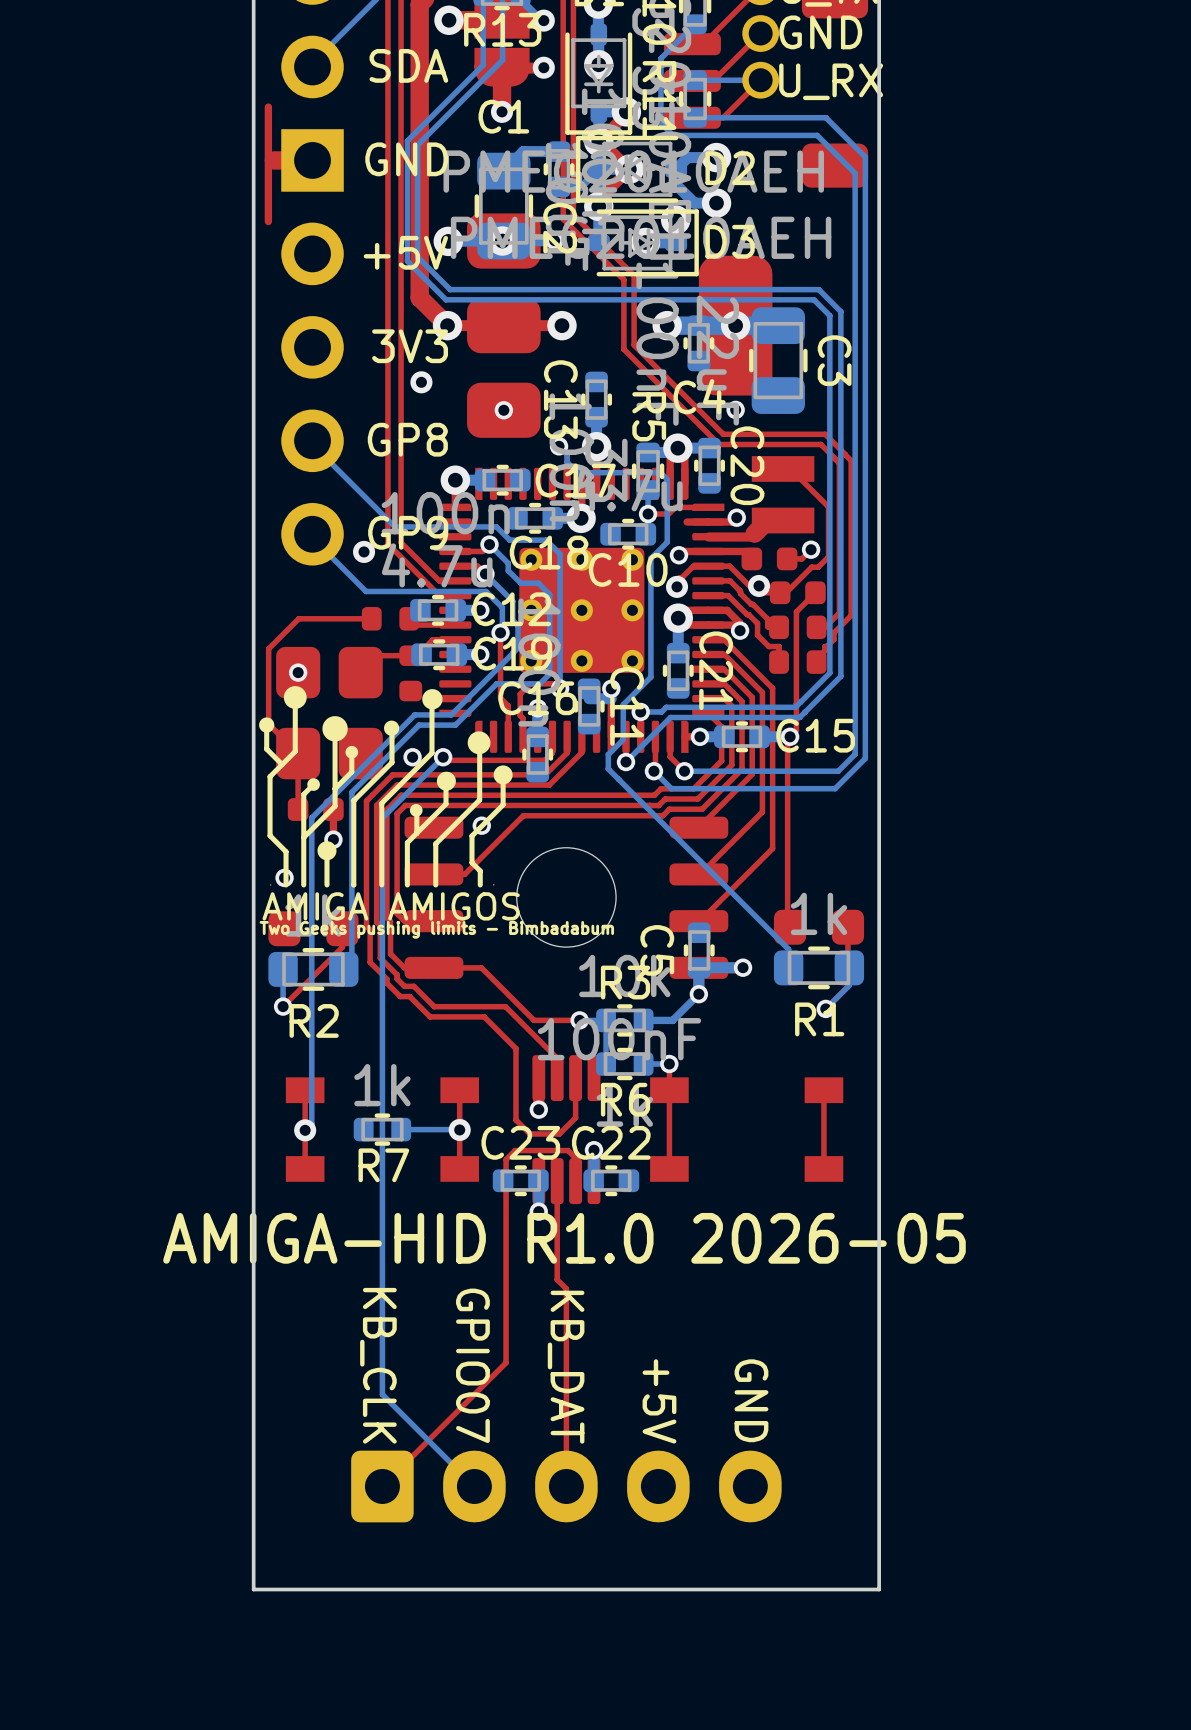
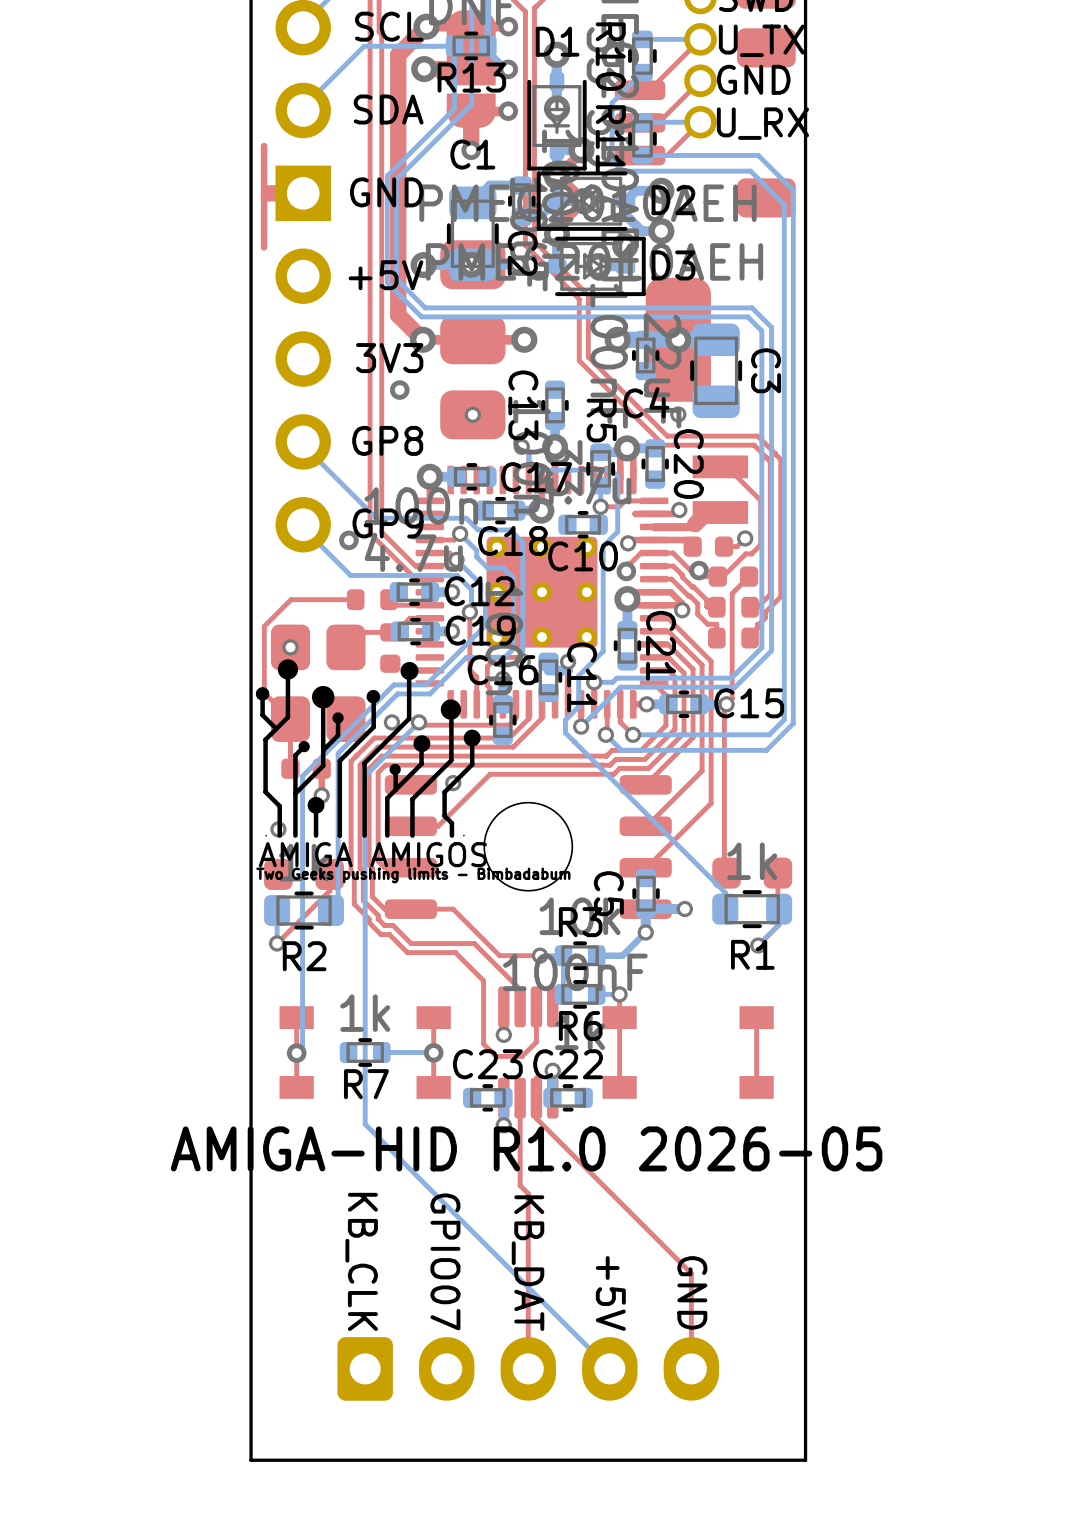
top track: (575, 1158) (568, 1150) (515, 1150) (506, 1159) (506, 1362) (382, 1486) -> none
top track: none -> (536, 1098) (536, 1118) (691, 1273) (691, 1368)
bottom track: (382, 1210) (382, 1394) (474, 1486) -> (365, 1124) (609, 1368)

